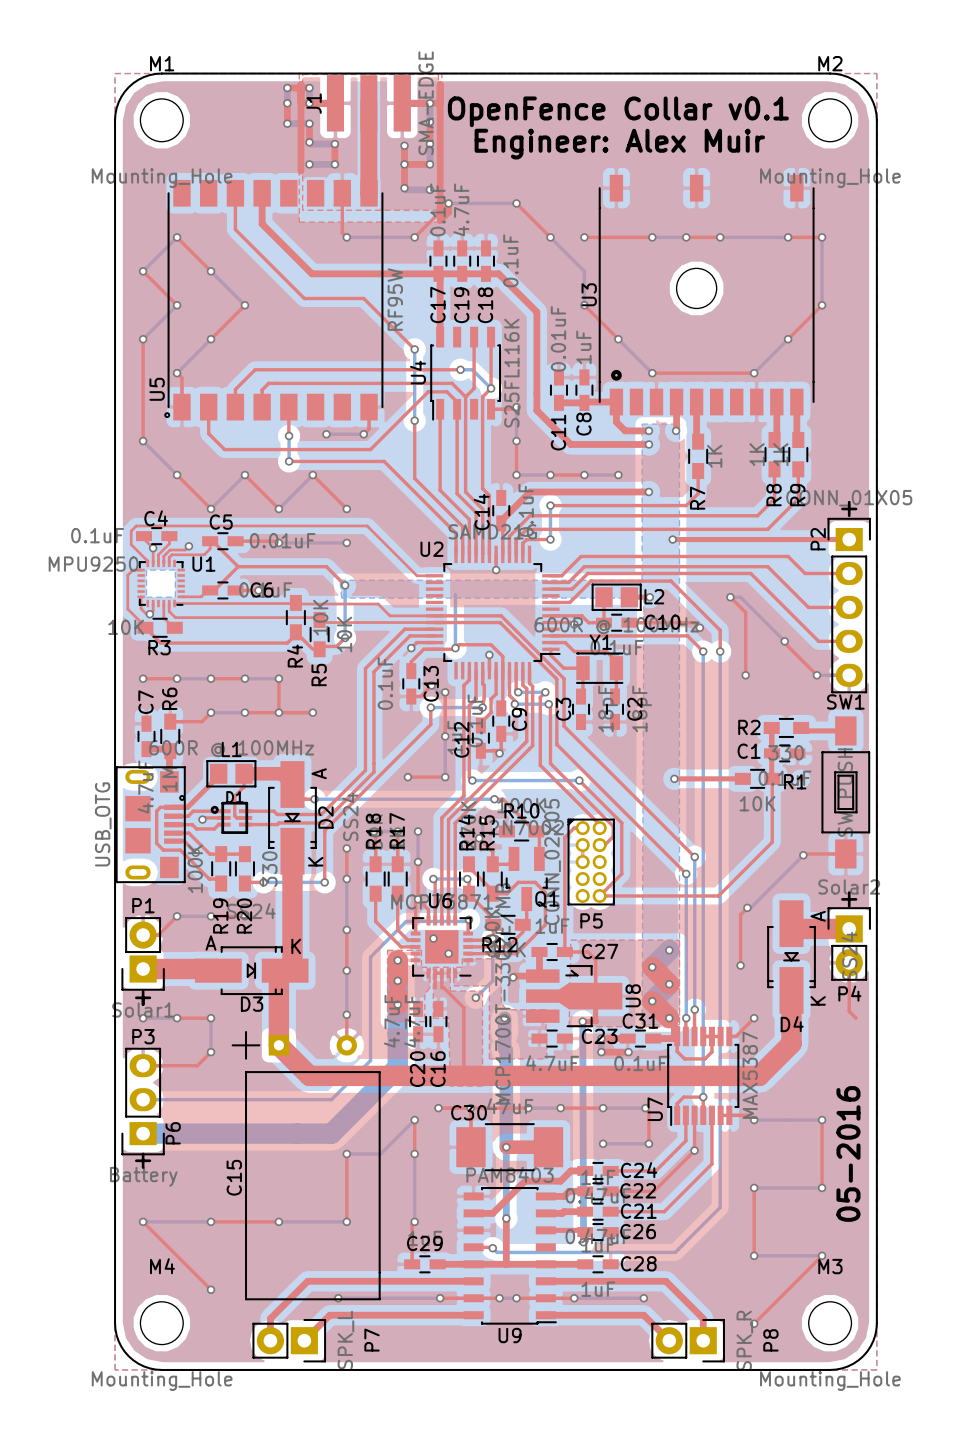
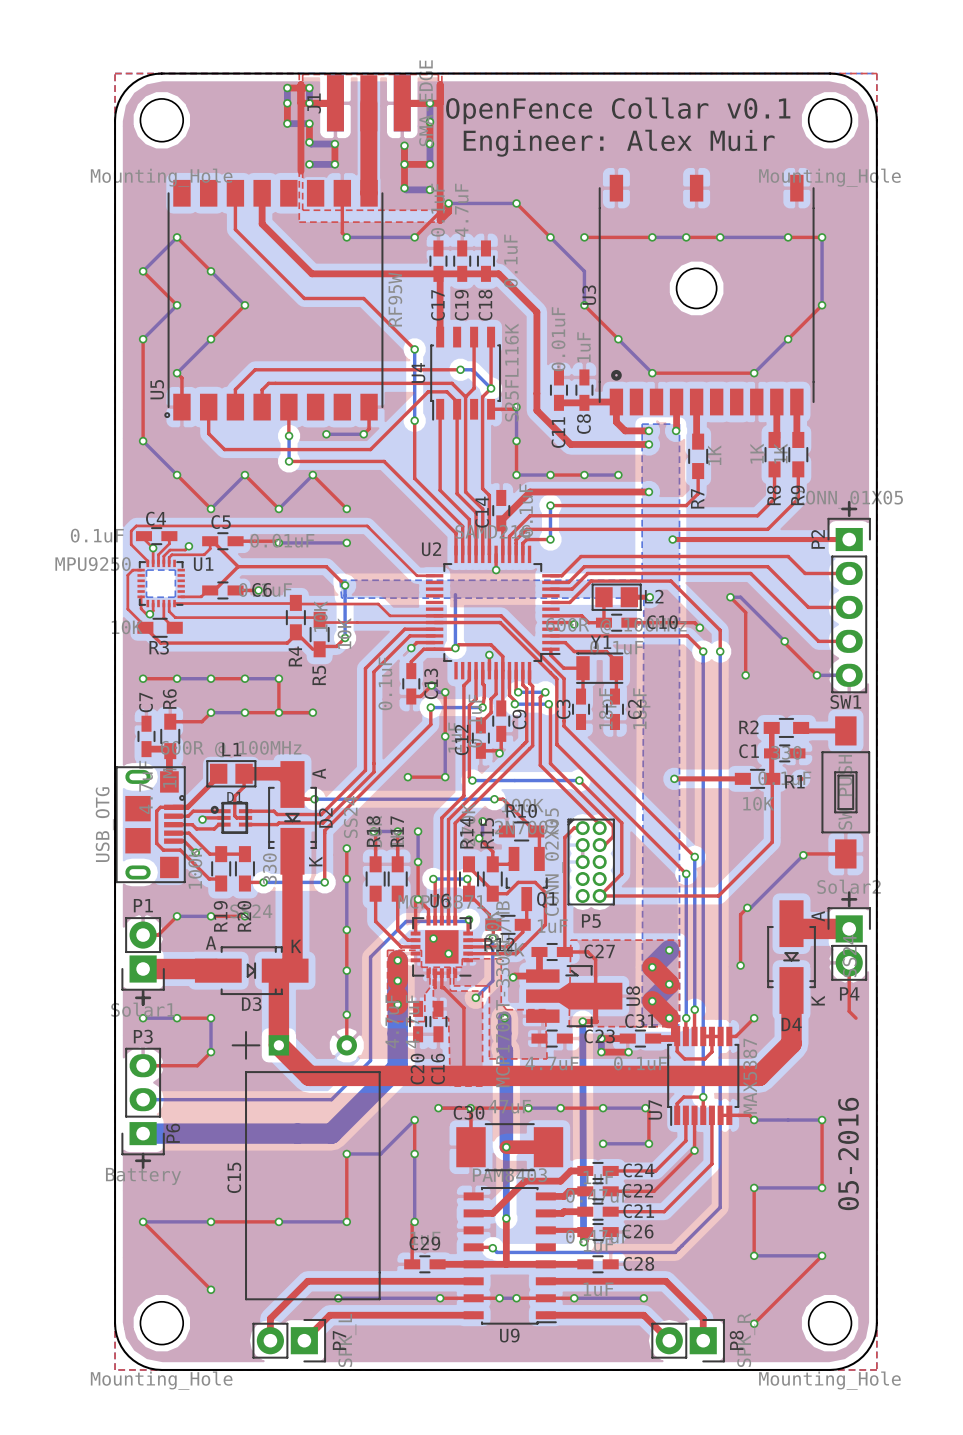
M1 name: M1 (162, 63) -> none
M2 name: M2 (830, 63) -> none
M4 name: M4 (162, 1266) -> none
M3 name: M3 (830, 1266) -> none
P7 name position: P7 (372, 1340) -> P7 (339, 1340)
P8 name position: P8 (770, 1340) -> P8 (736, 1340)

